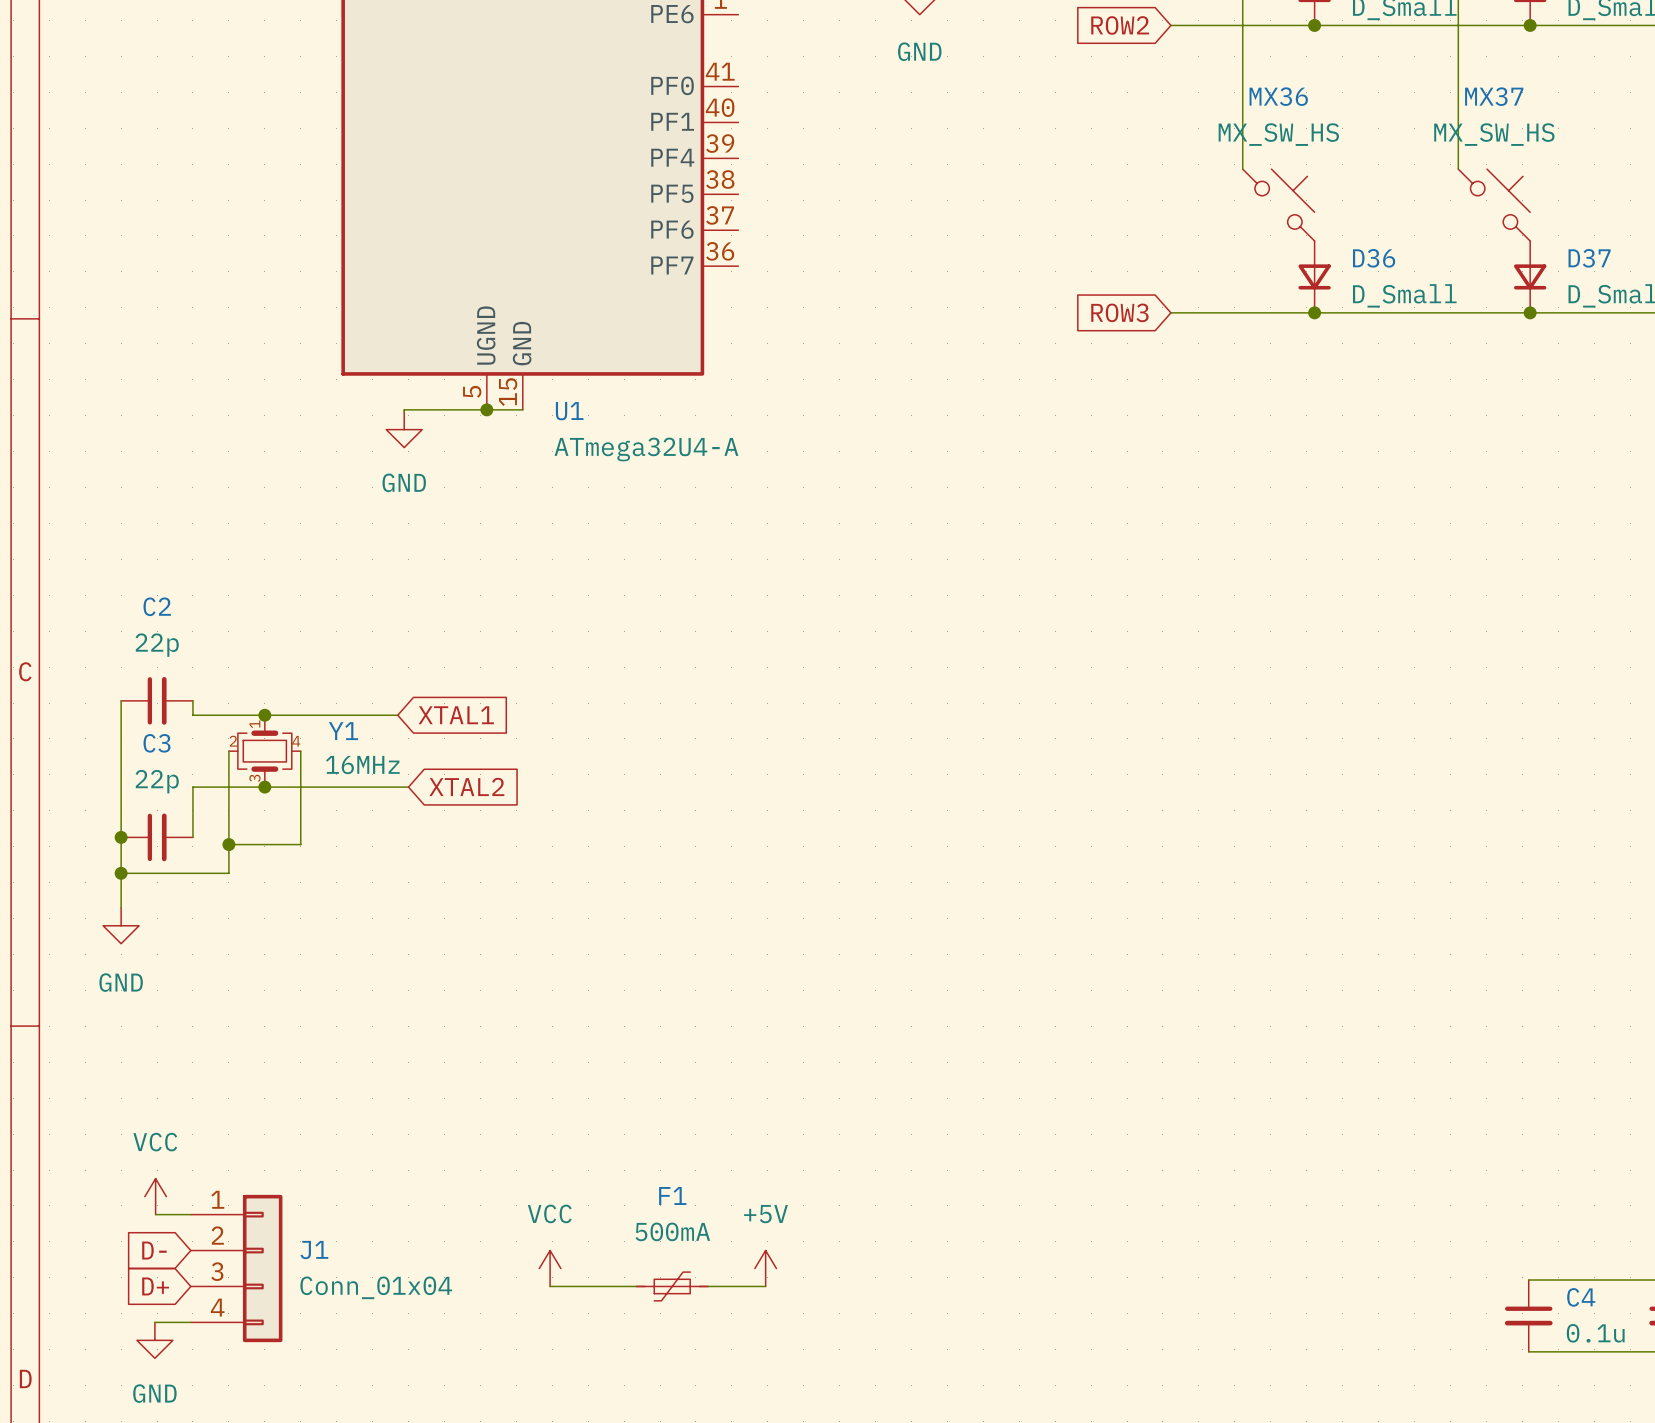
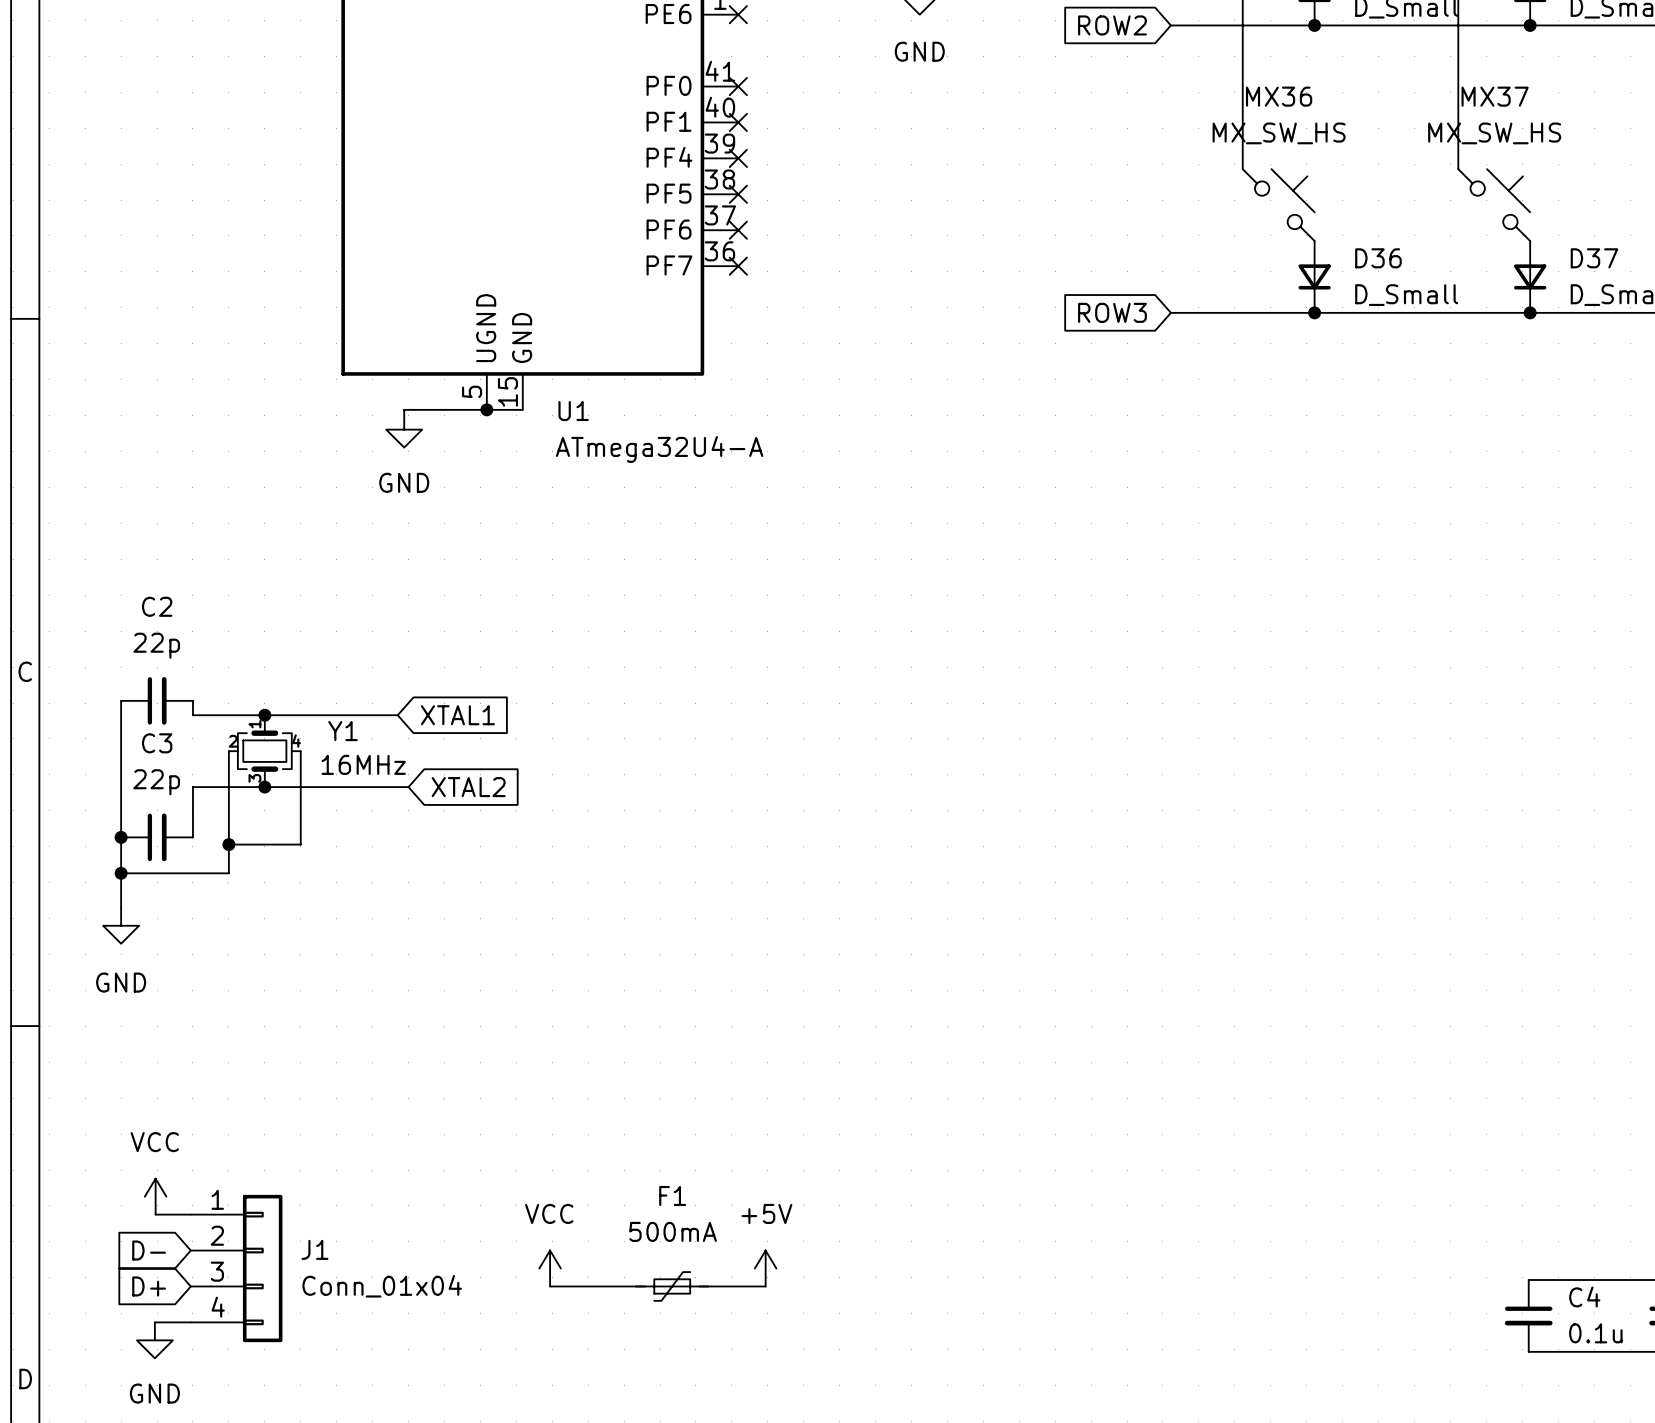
no-connect mark: none -> (738, 14)
no-connect mark: none -> (738, 86)
no-connect mark: none -> (738, 122)
no-connect mark: none -> (738, 158)
no-connect mark: none -> (738, 194)
no-connect mark: none -> (738, 230)
no-connect mark: none -> (738, 266)

